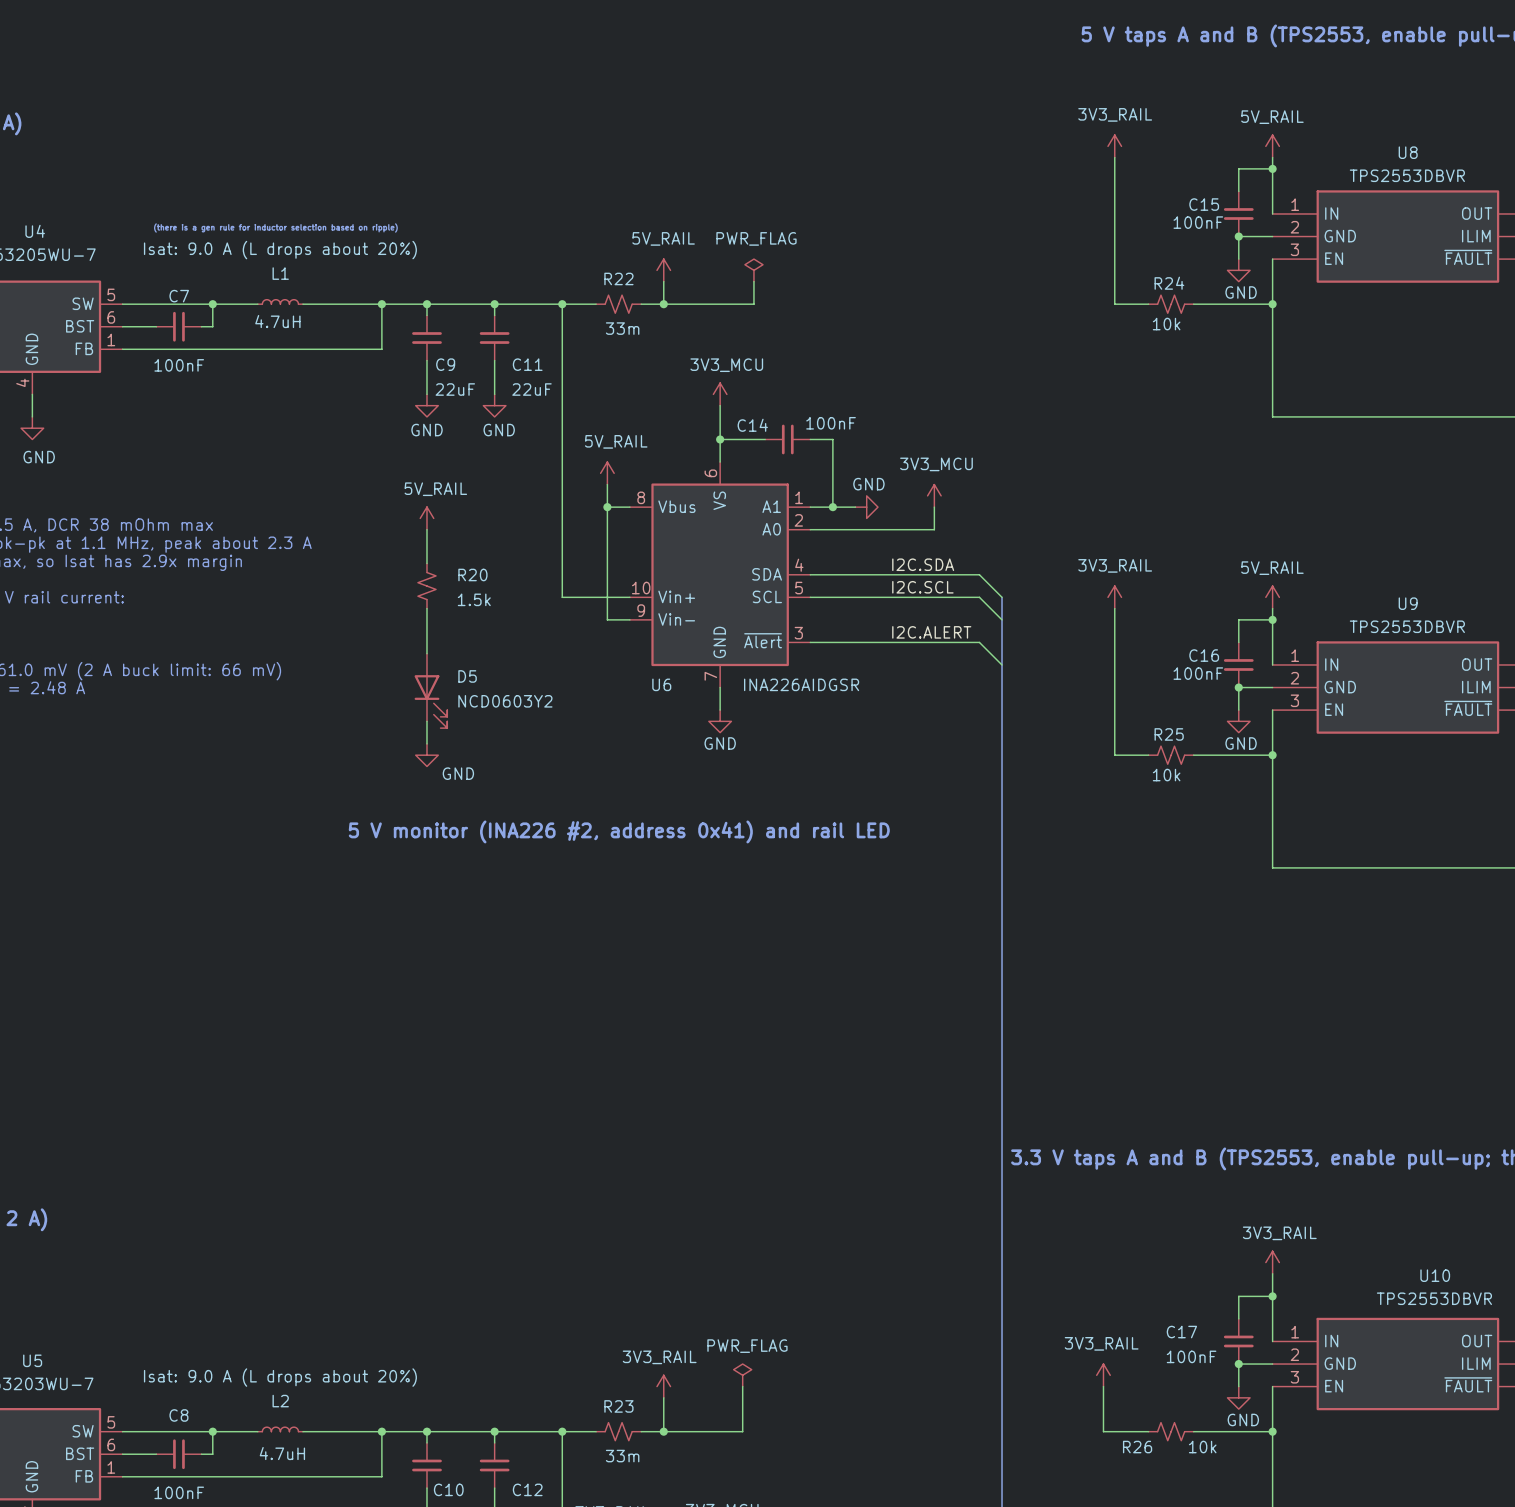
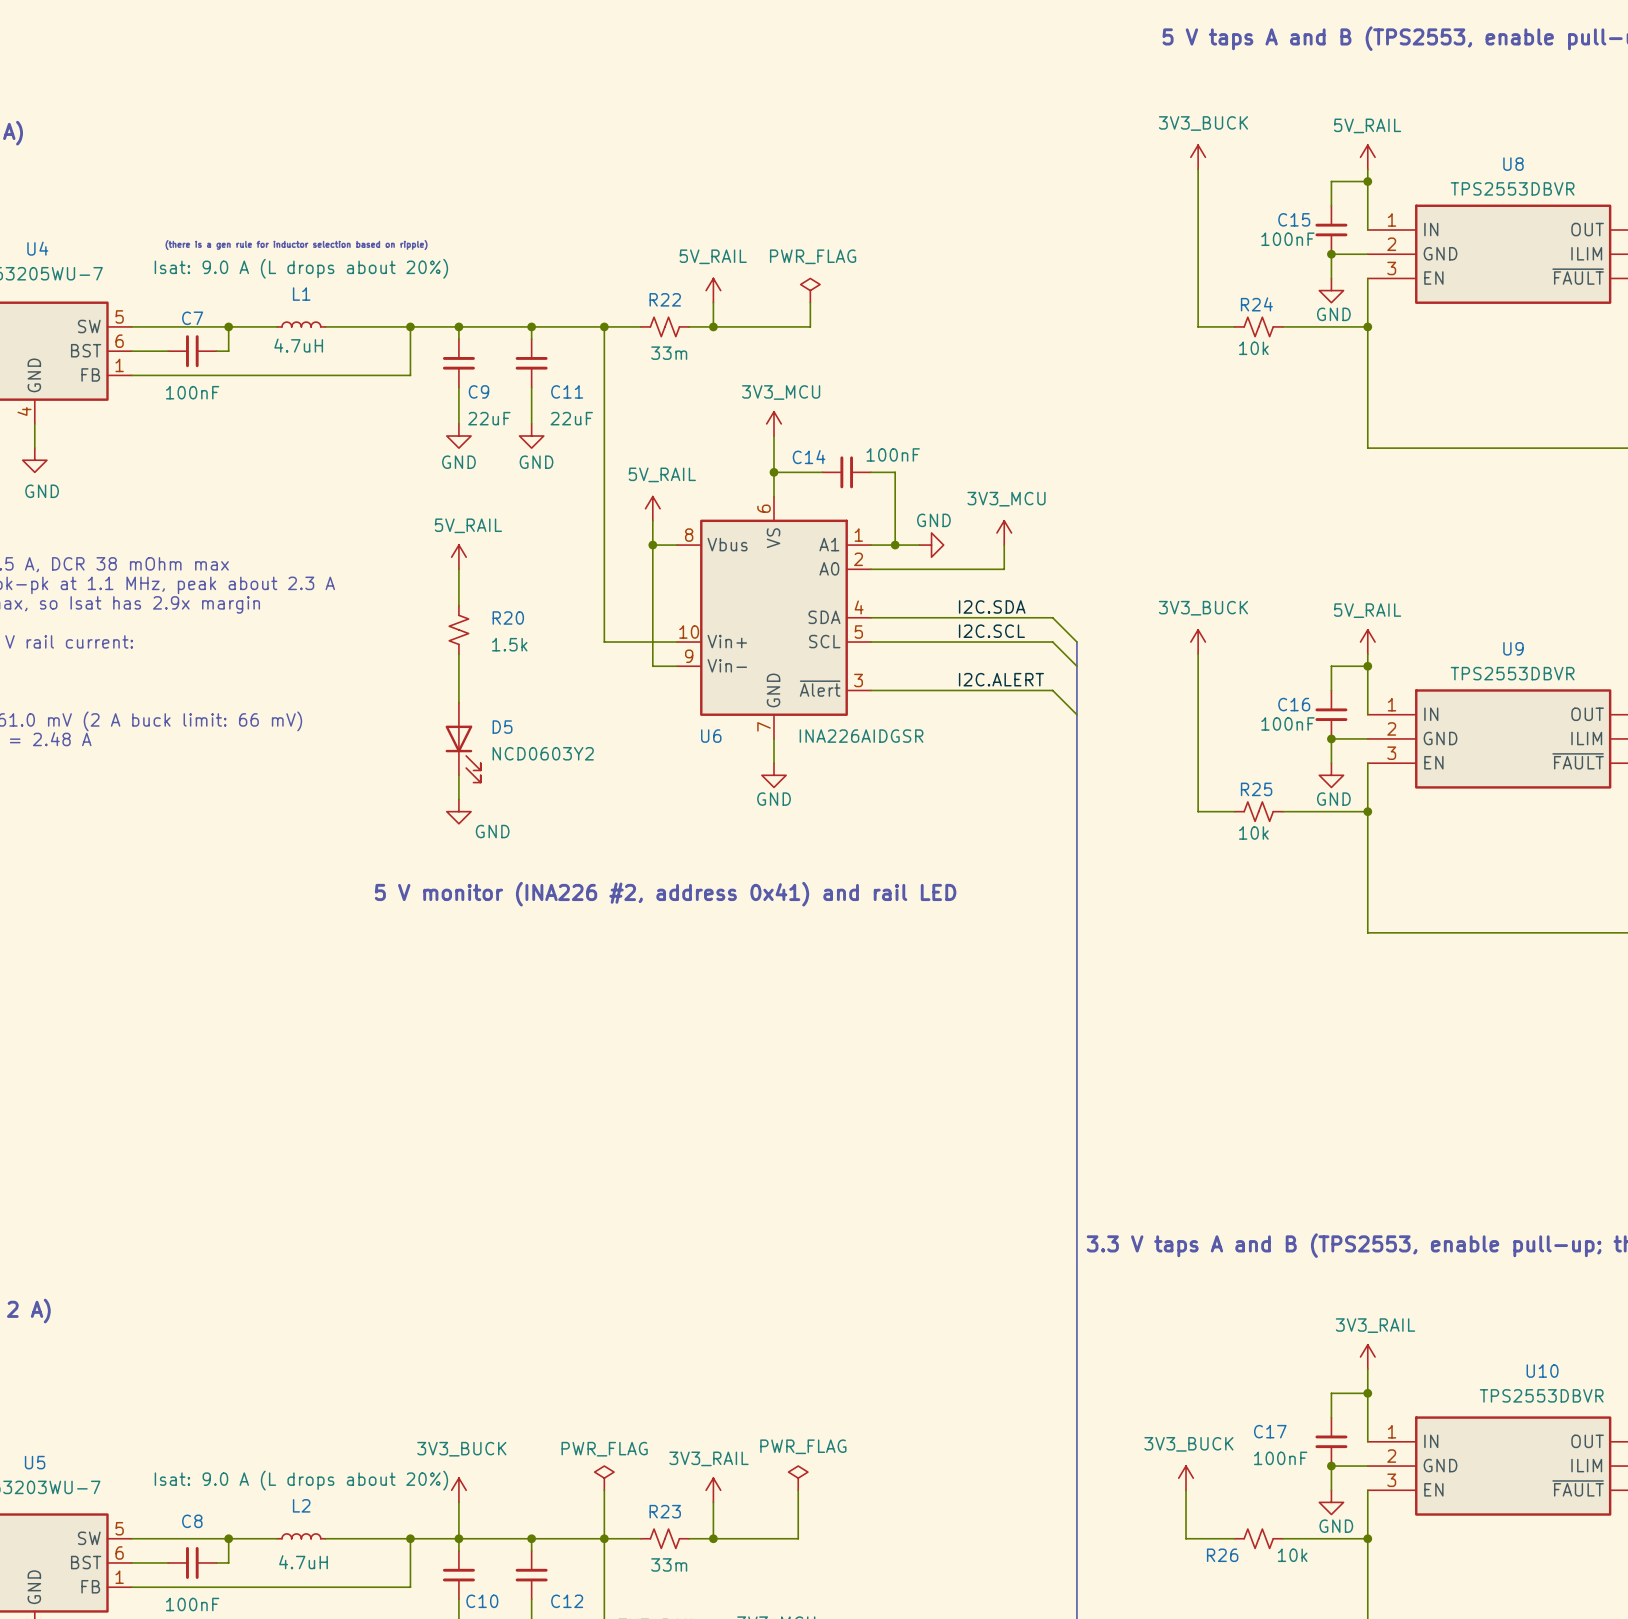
power symbol: 3V3_RAIL (1114, 146) -> 3V3_BUCK (1198, 157)
power symbol: 3V3_RAIL (1114, 597) -> 3V3_BUCK (1198, 642)
power symbol: none -> PWR_FLAG (604, 1478)
power symbol: 3V3_RAIL (1103, 1375) -> 3V3_BUCK (1186, 1478)
power symbol: none -> 3V3_BUCK (458, 1490)
wire: none -> (604, 1490) (604, 1538)
wire: none -> (458, 1502) (458, 1538)

